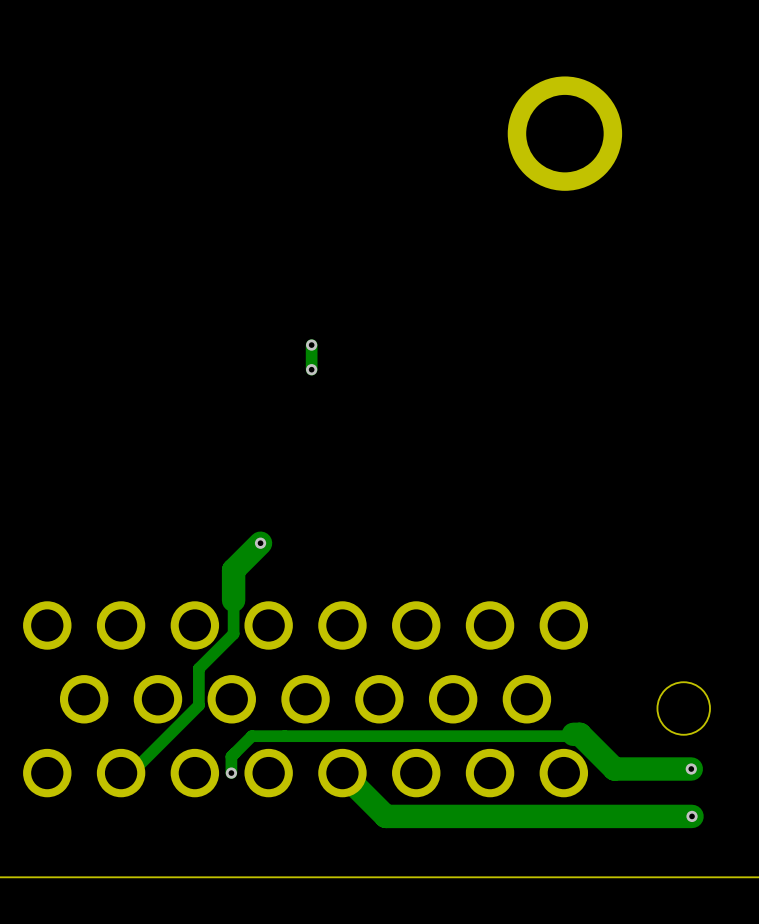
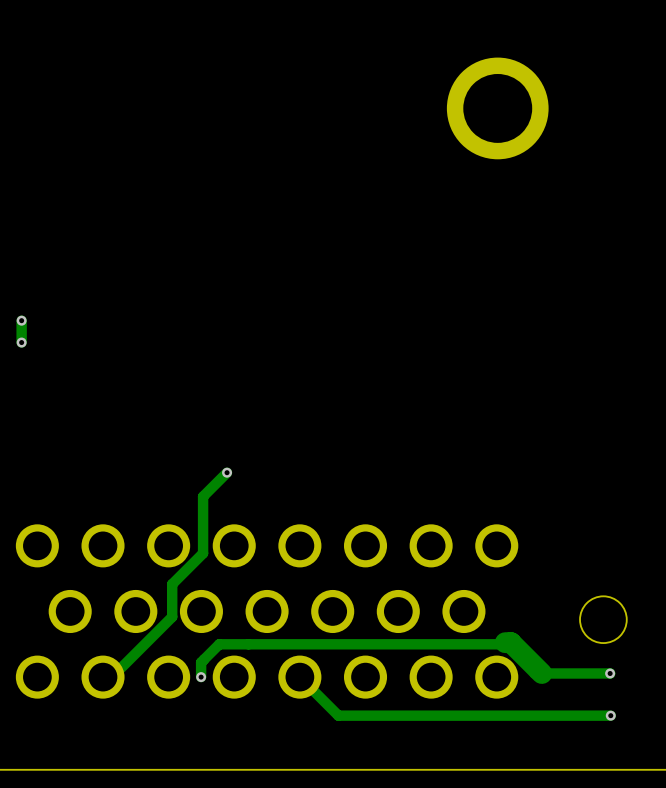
track: (311, 345) (311, 369) -> (21, 320) (21, 342)
via: (311, 345) -> none
via: (311, 369) -> none
via: none -> (21, 320)
via: none -> (21, 342)
track width: thick (260, 543) (233, 570) (233, 600) -> thin (227, 472) (203, 496) (203, 523)
track width: thick (691, 769) (614, 769) -> thin (610, 673) (541, 673)
track width: thick (342, 773) (385, 816) (692, 816) -> thin (299, 677) (338, 715) (610, 715)

